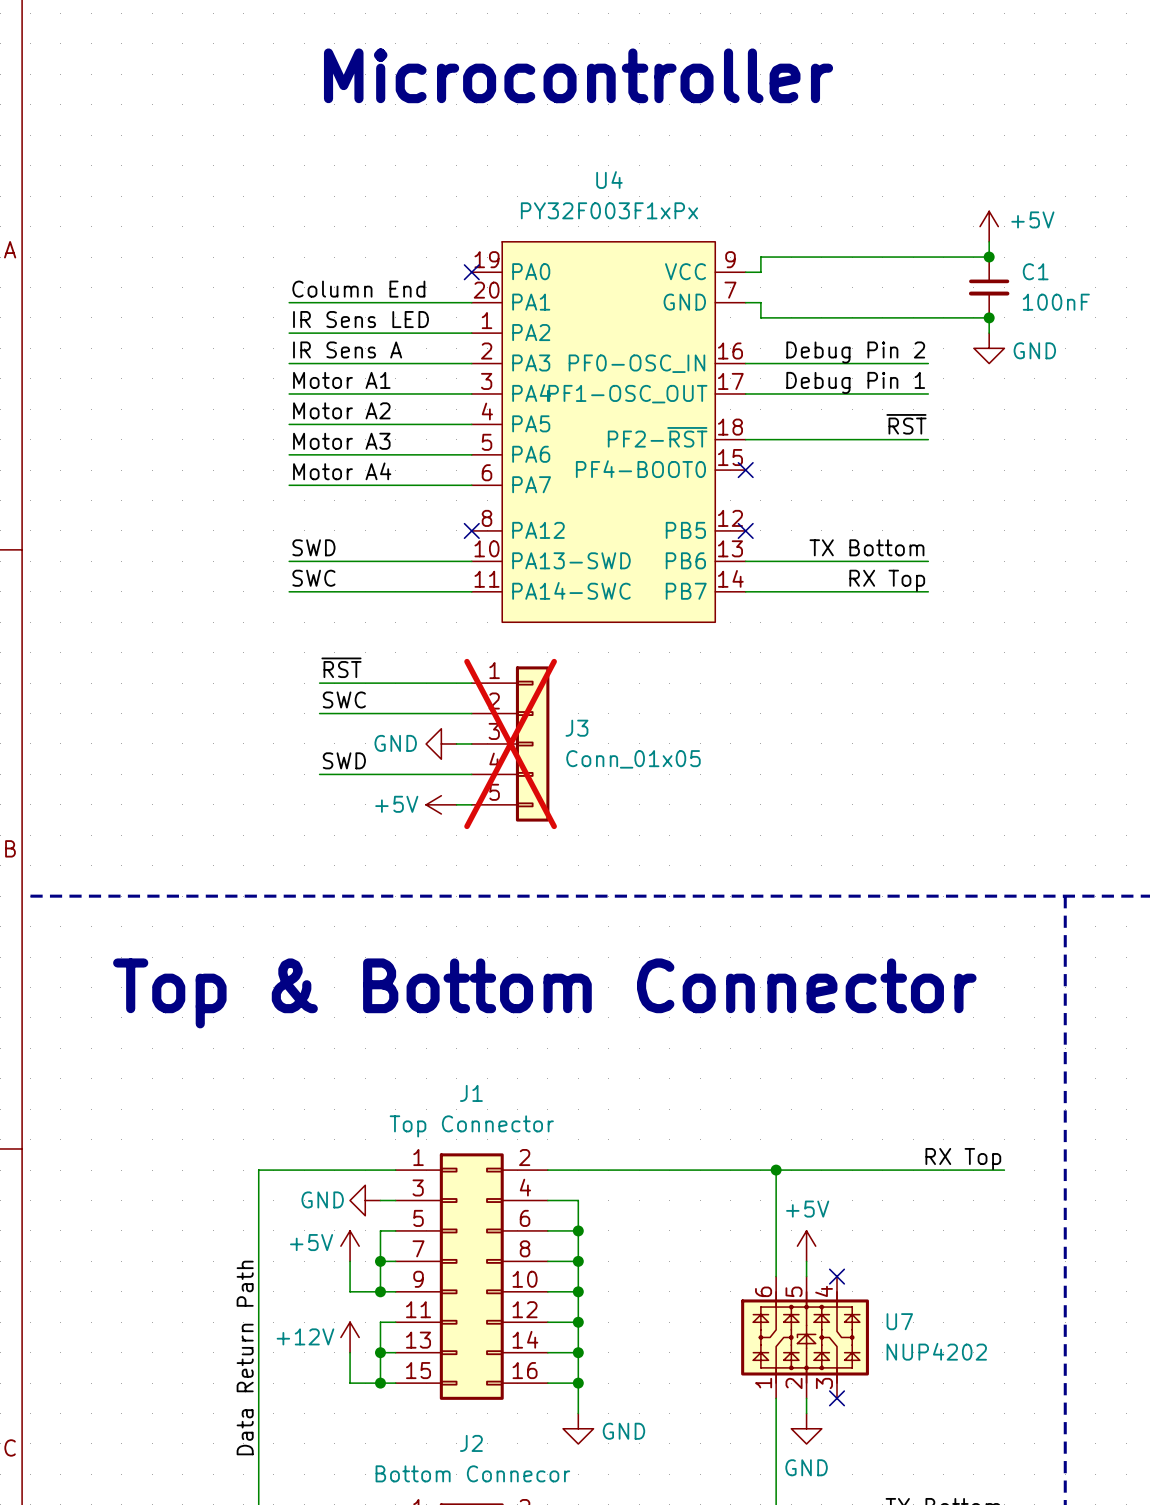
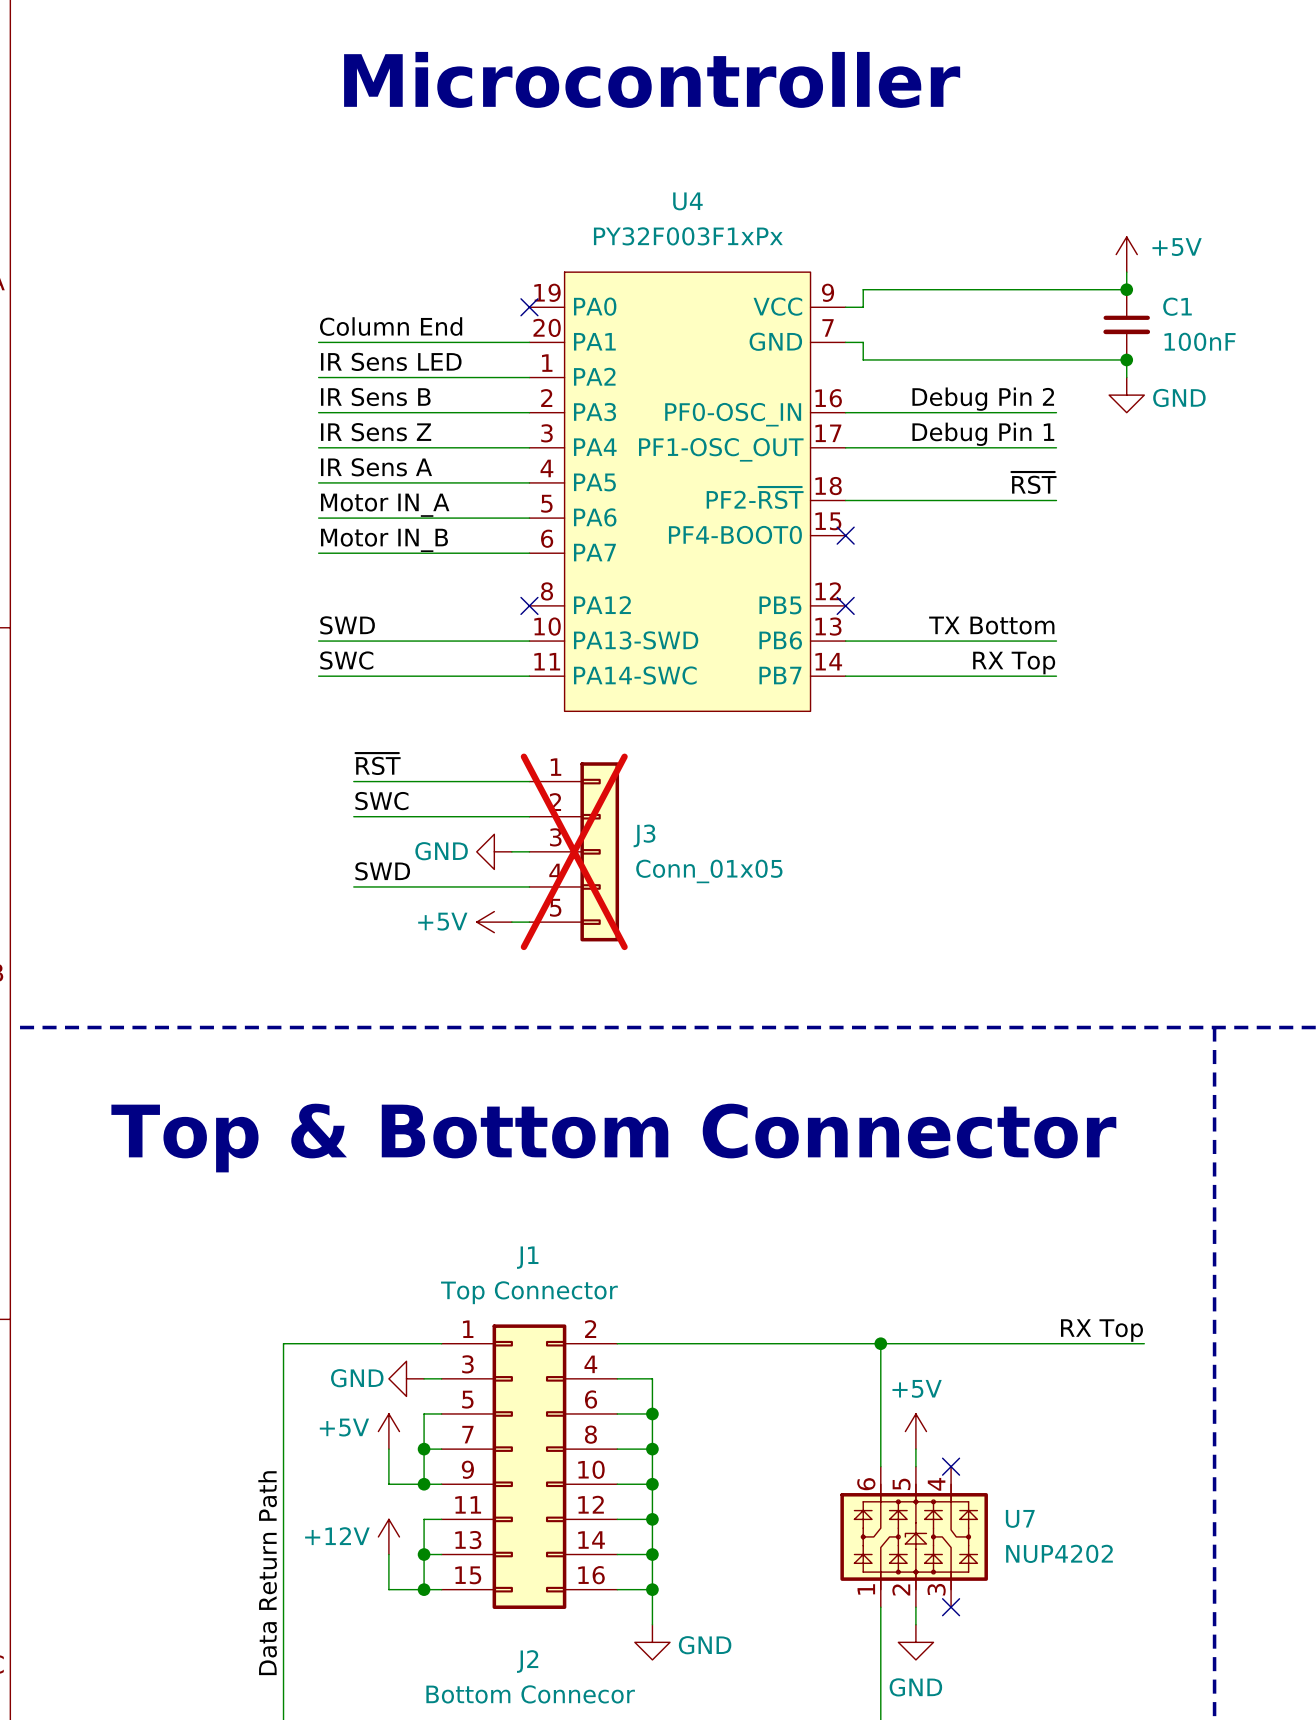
label: IR Sens A (347, 349) -> IR Sens B (375, 397)
label: Motor A1 (341, 380) -> IR Sens Z (376, 432)
label: Motor A2 (341, 410) -> IR Sens A (376, 467)
label: Motor A3 (341, 441) -> Motor IN_A (385, 505)
label: Motor A4 (342, 471) -> Motor IN_B (384, 540)

